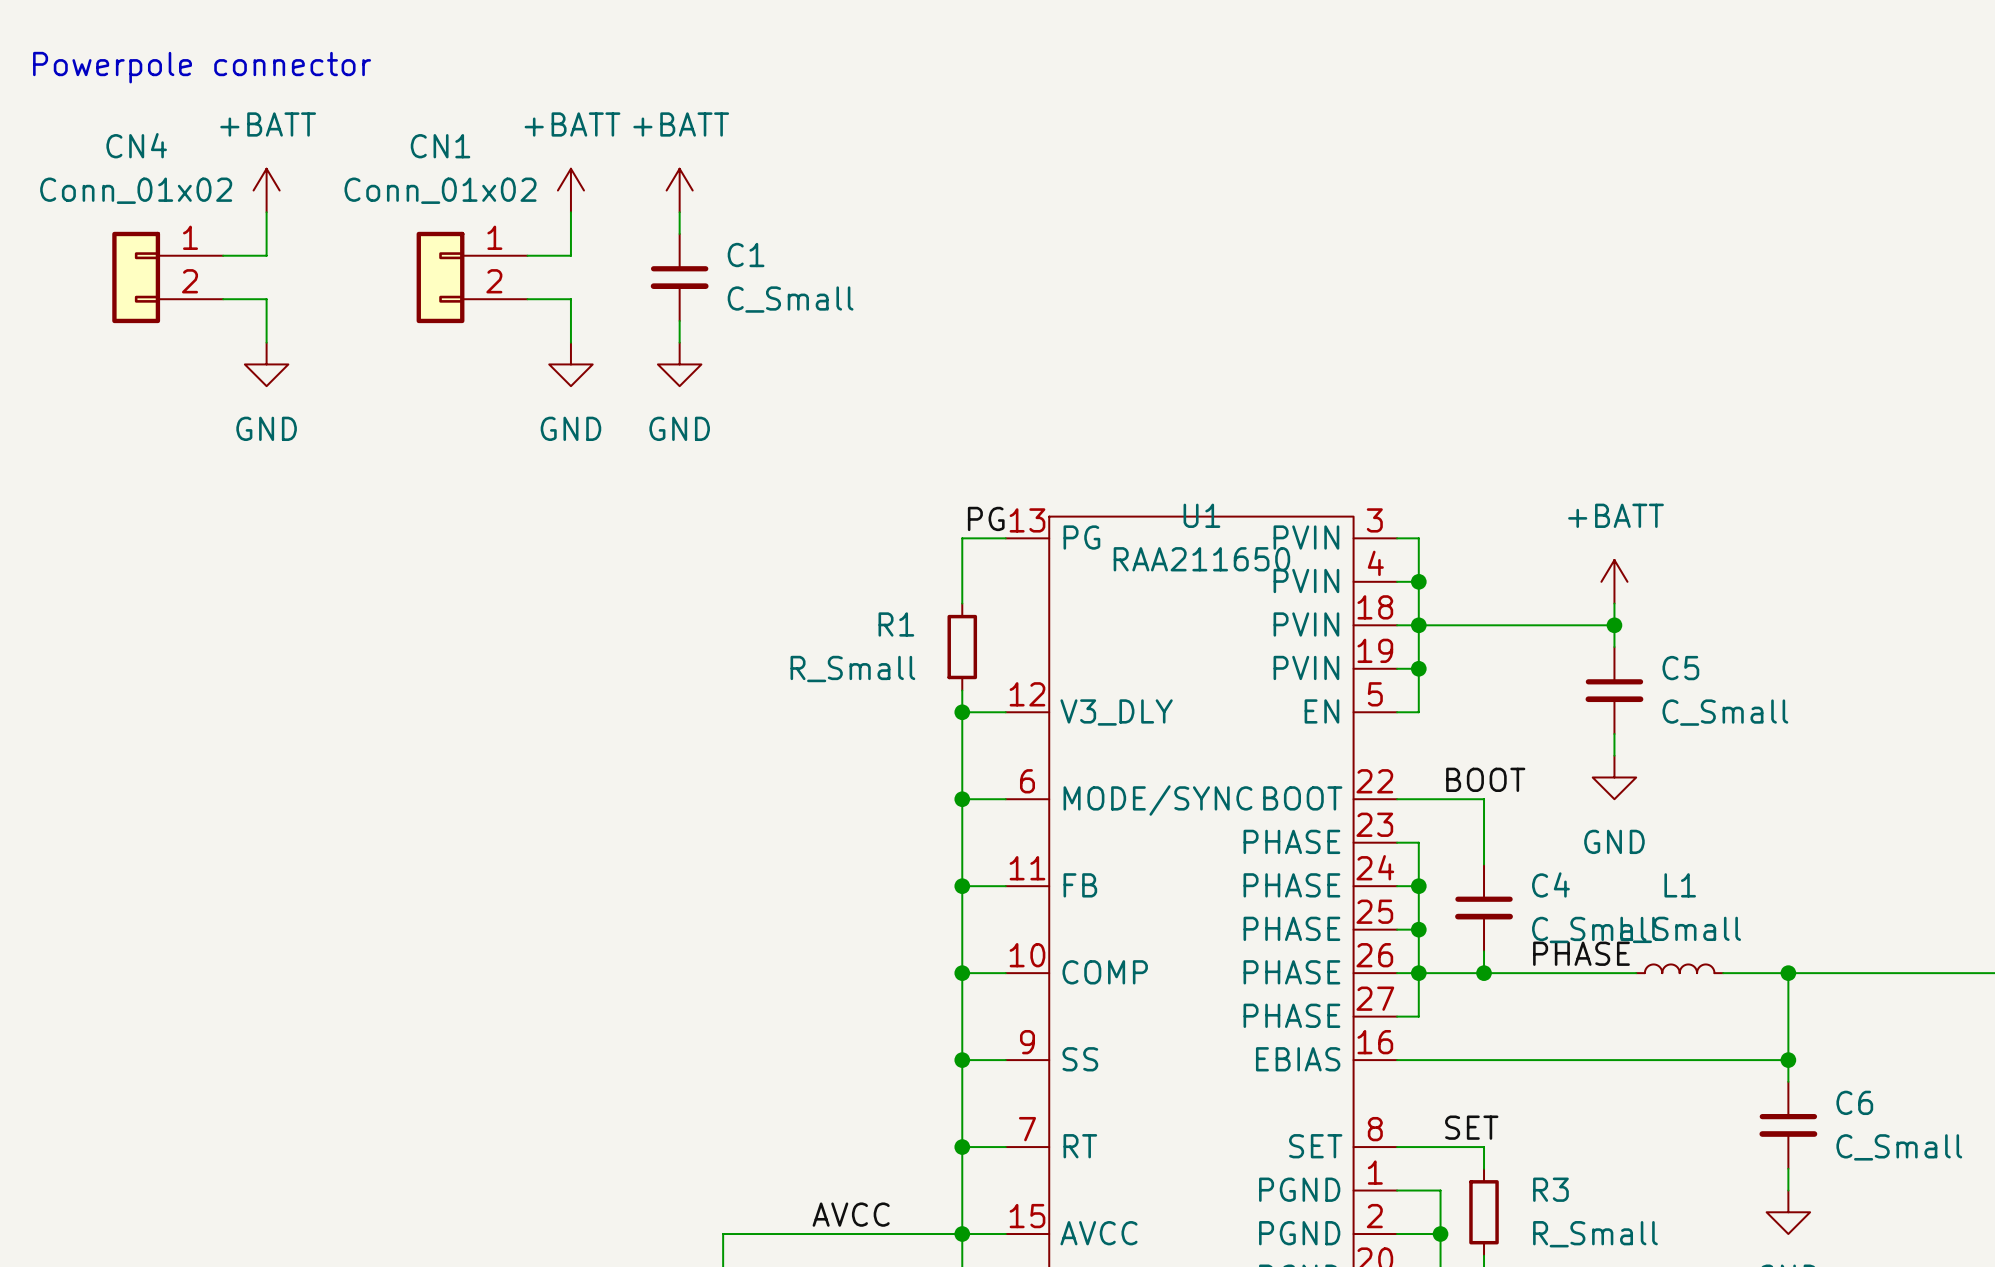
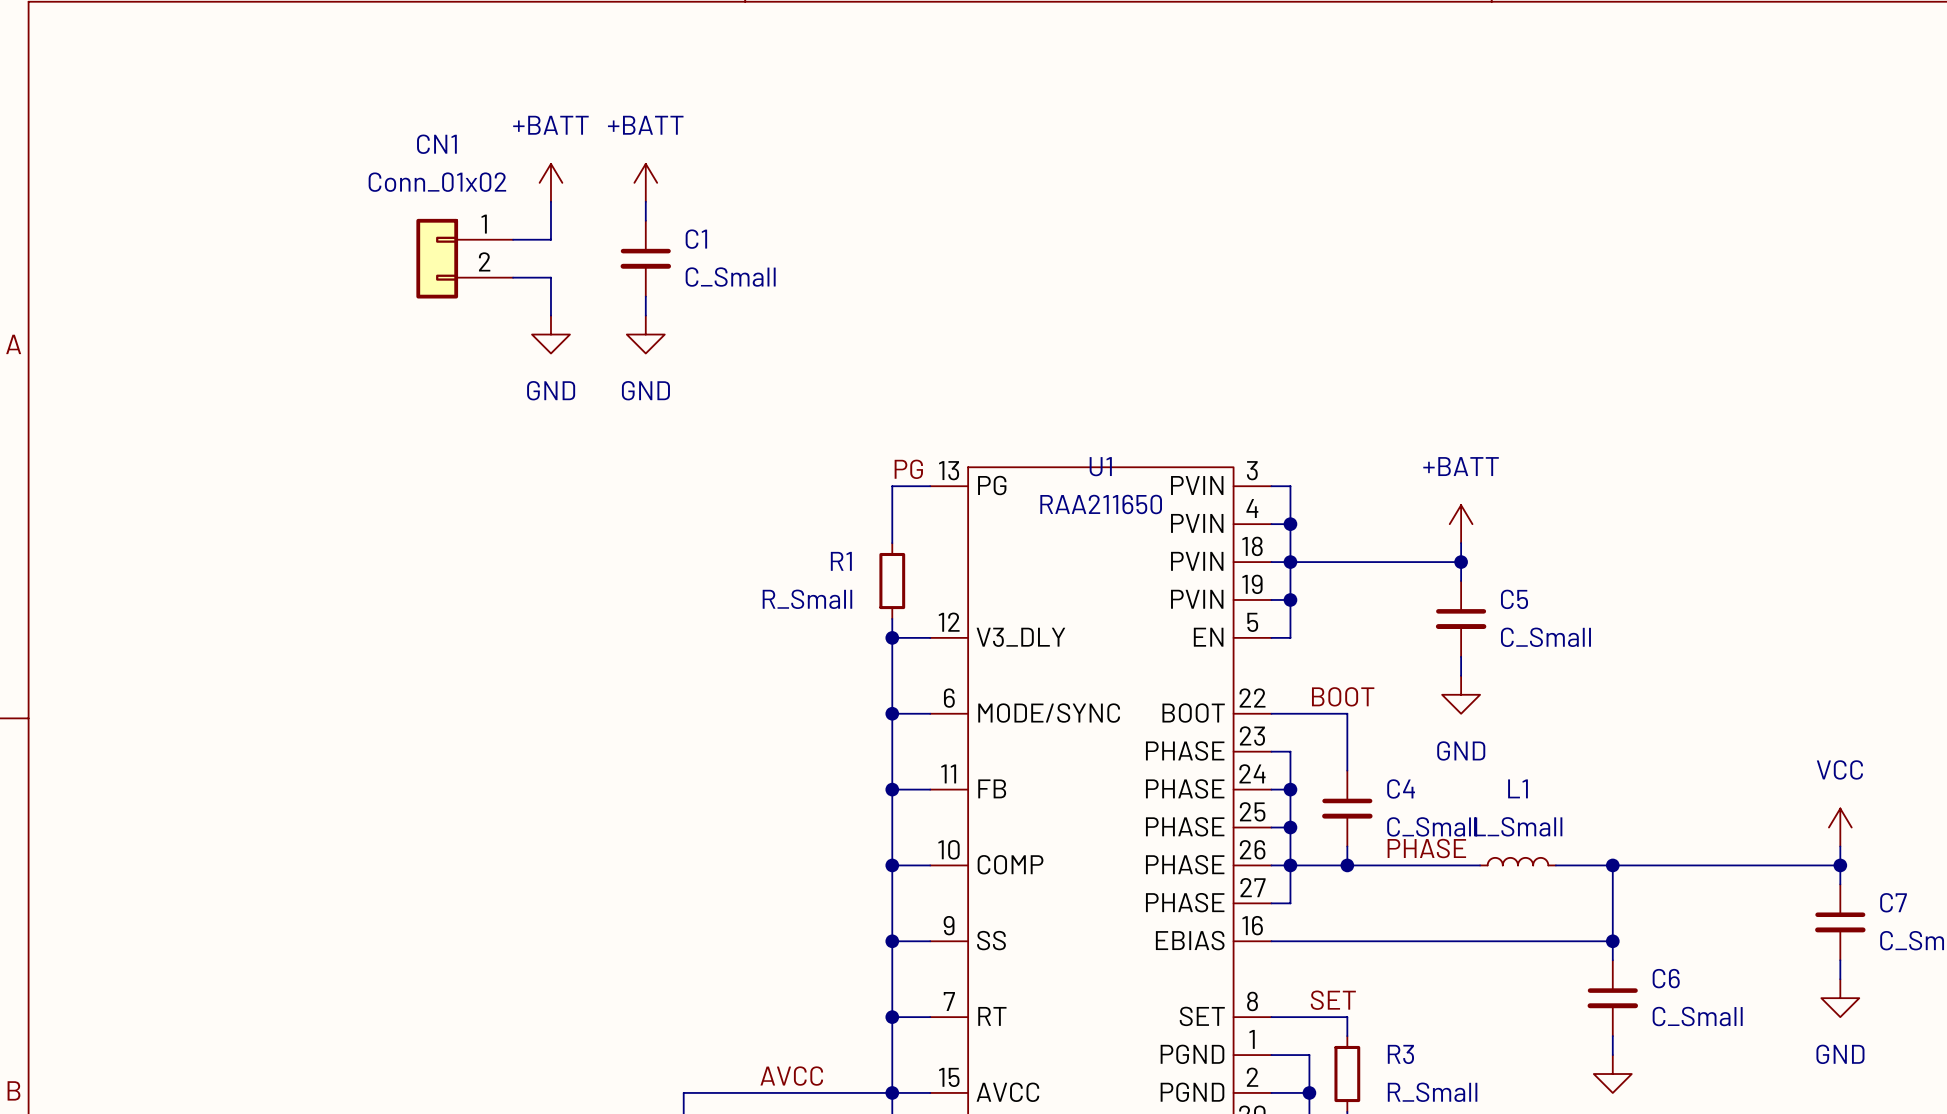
text: Powerpole connector (202, 67) -> none
power symbol: +BATT (266, 190) -> none
wire: (266, 212) (266, 255) (223, 255) -> none
CN4: Conn_01x02 (167, 277) -> none
wire: (223, 299) (266, 299) (266, 342) -> none
power symbol: GND (266, 364) -> none

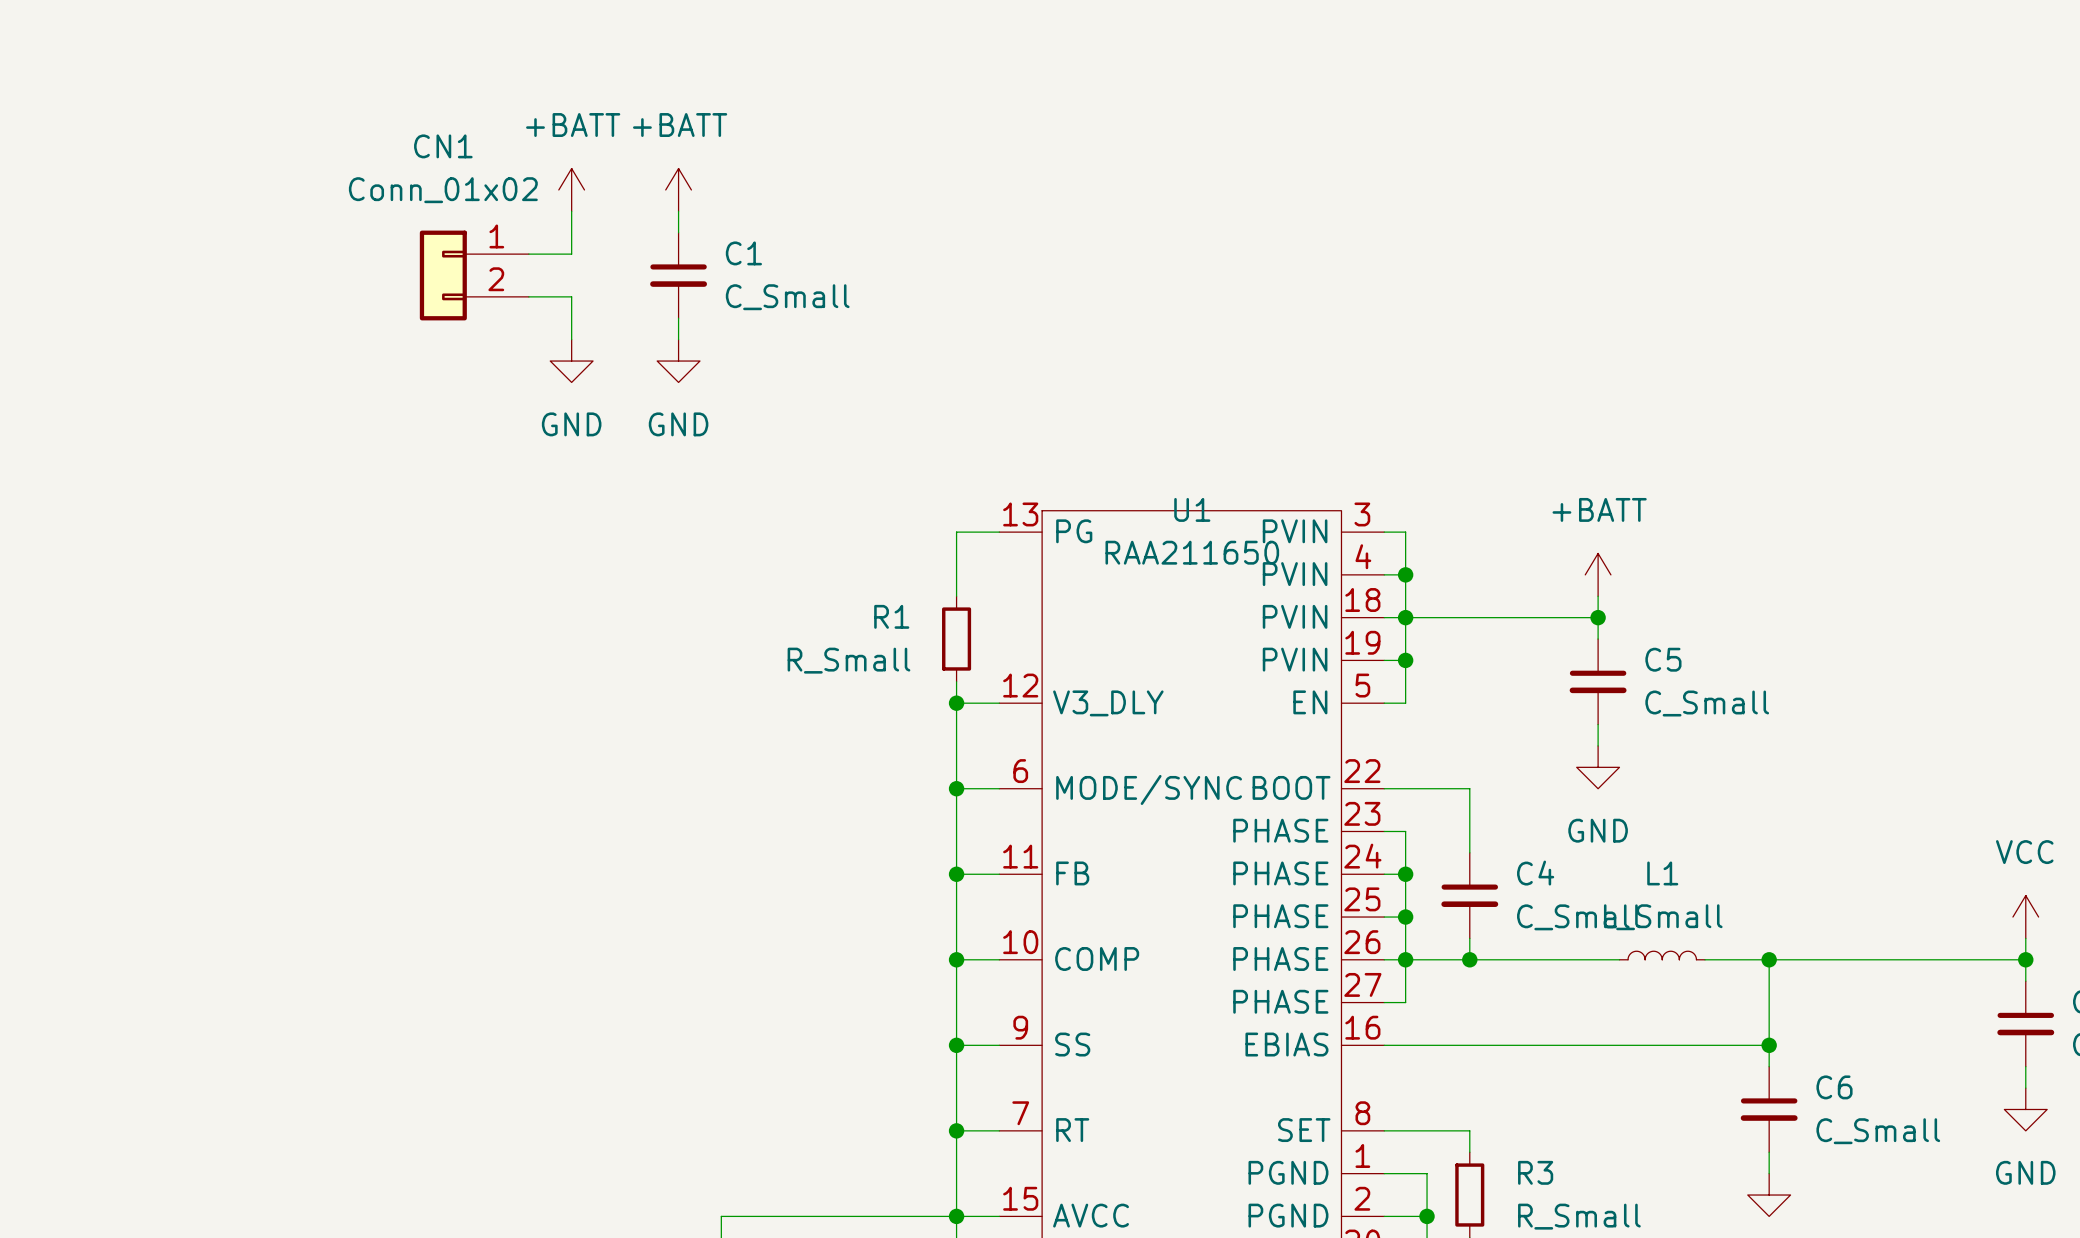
label: PG (908, 469) -> none
label: BOOT (1343, 696) -> none
label: PHASE (1426, 848) -> none
label: SET (1333, 1000) -> none
label: AVCC (791, 1076) -> none

